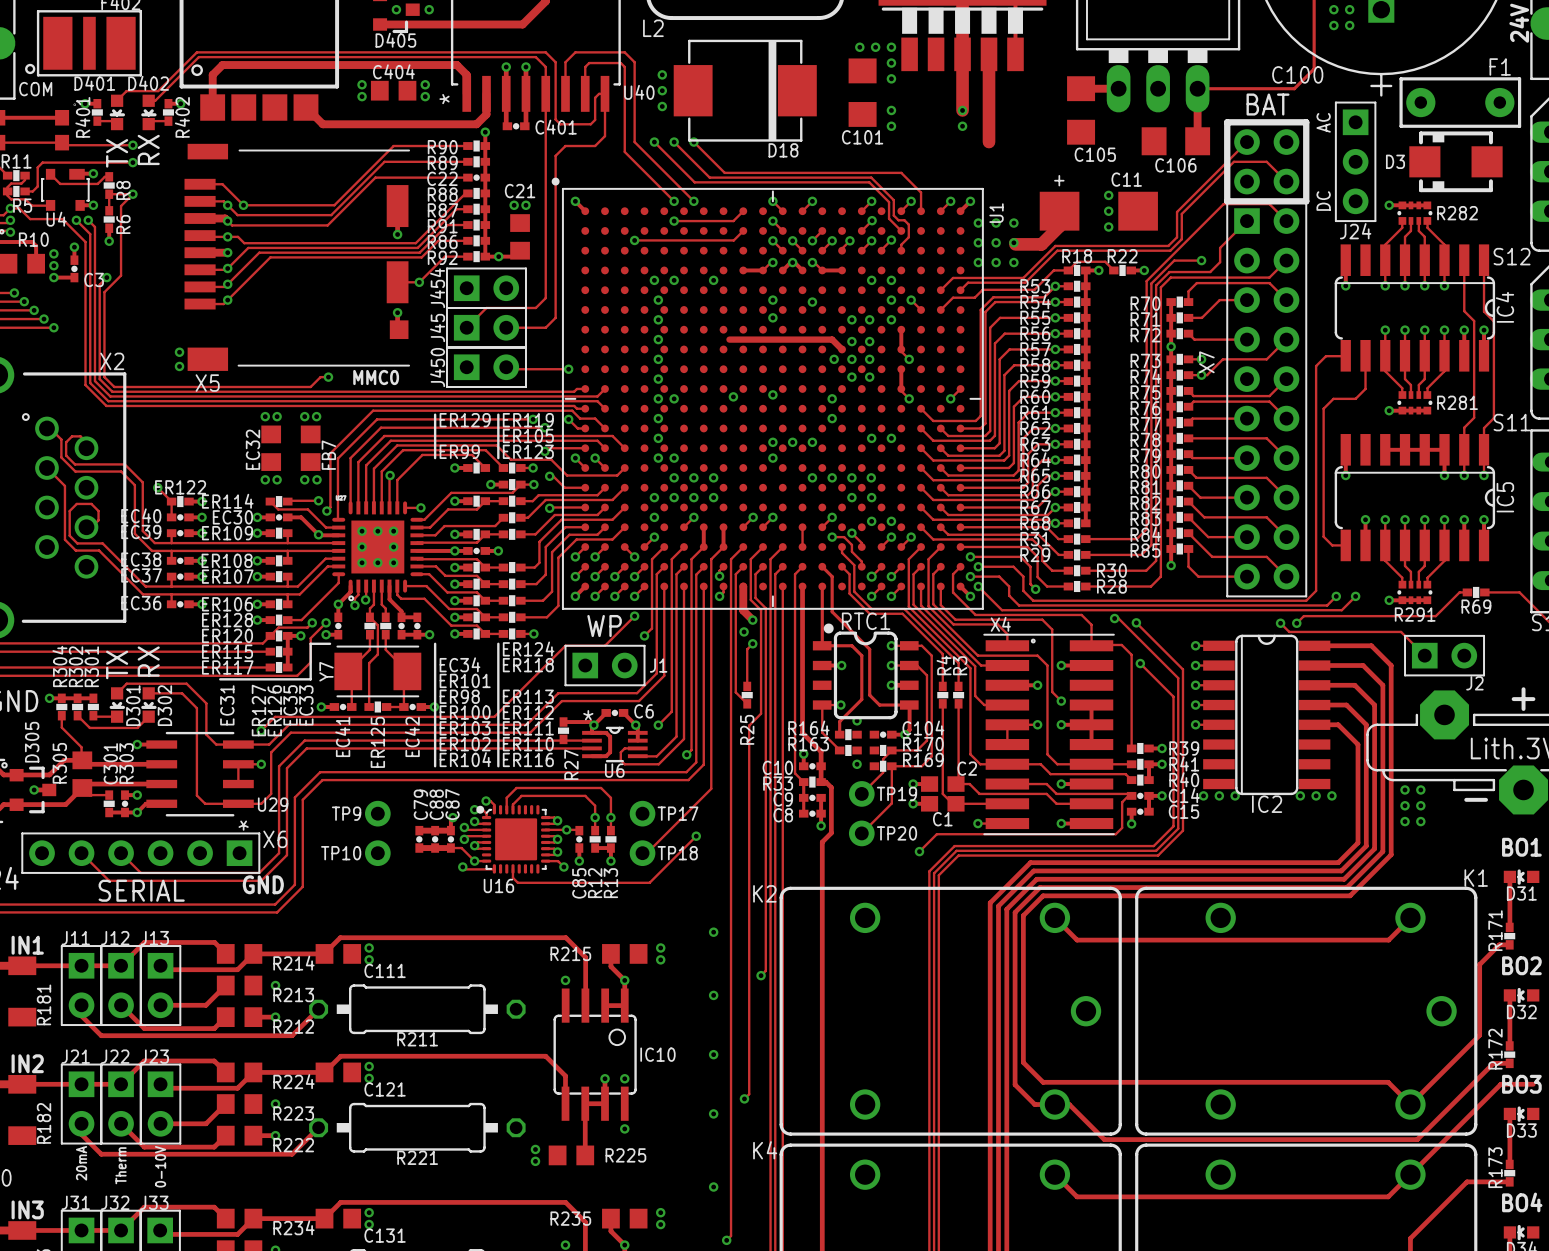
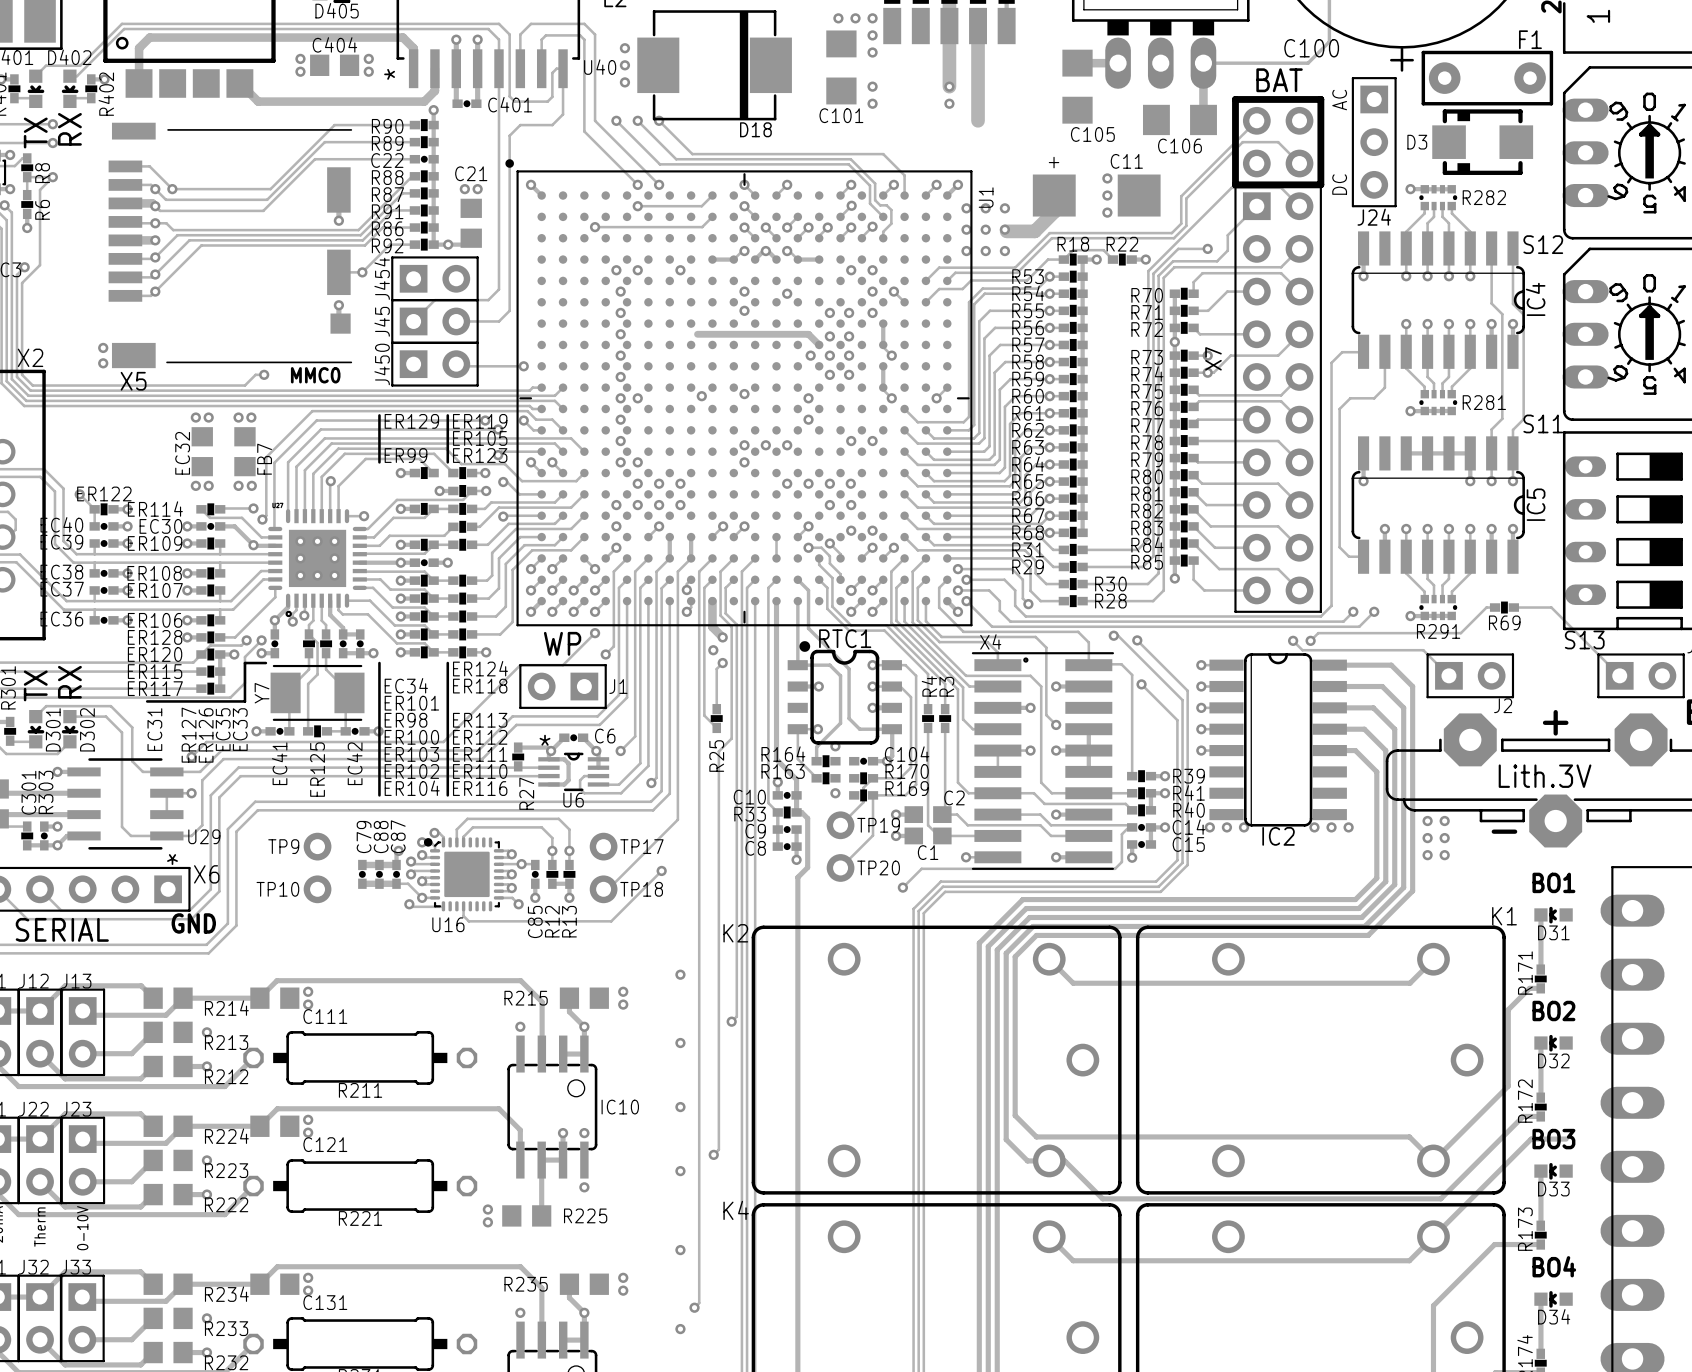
J1 rotation: 0° (605, 665) -> 180° (563, 686)

